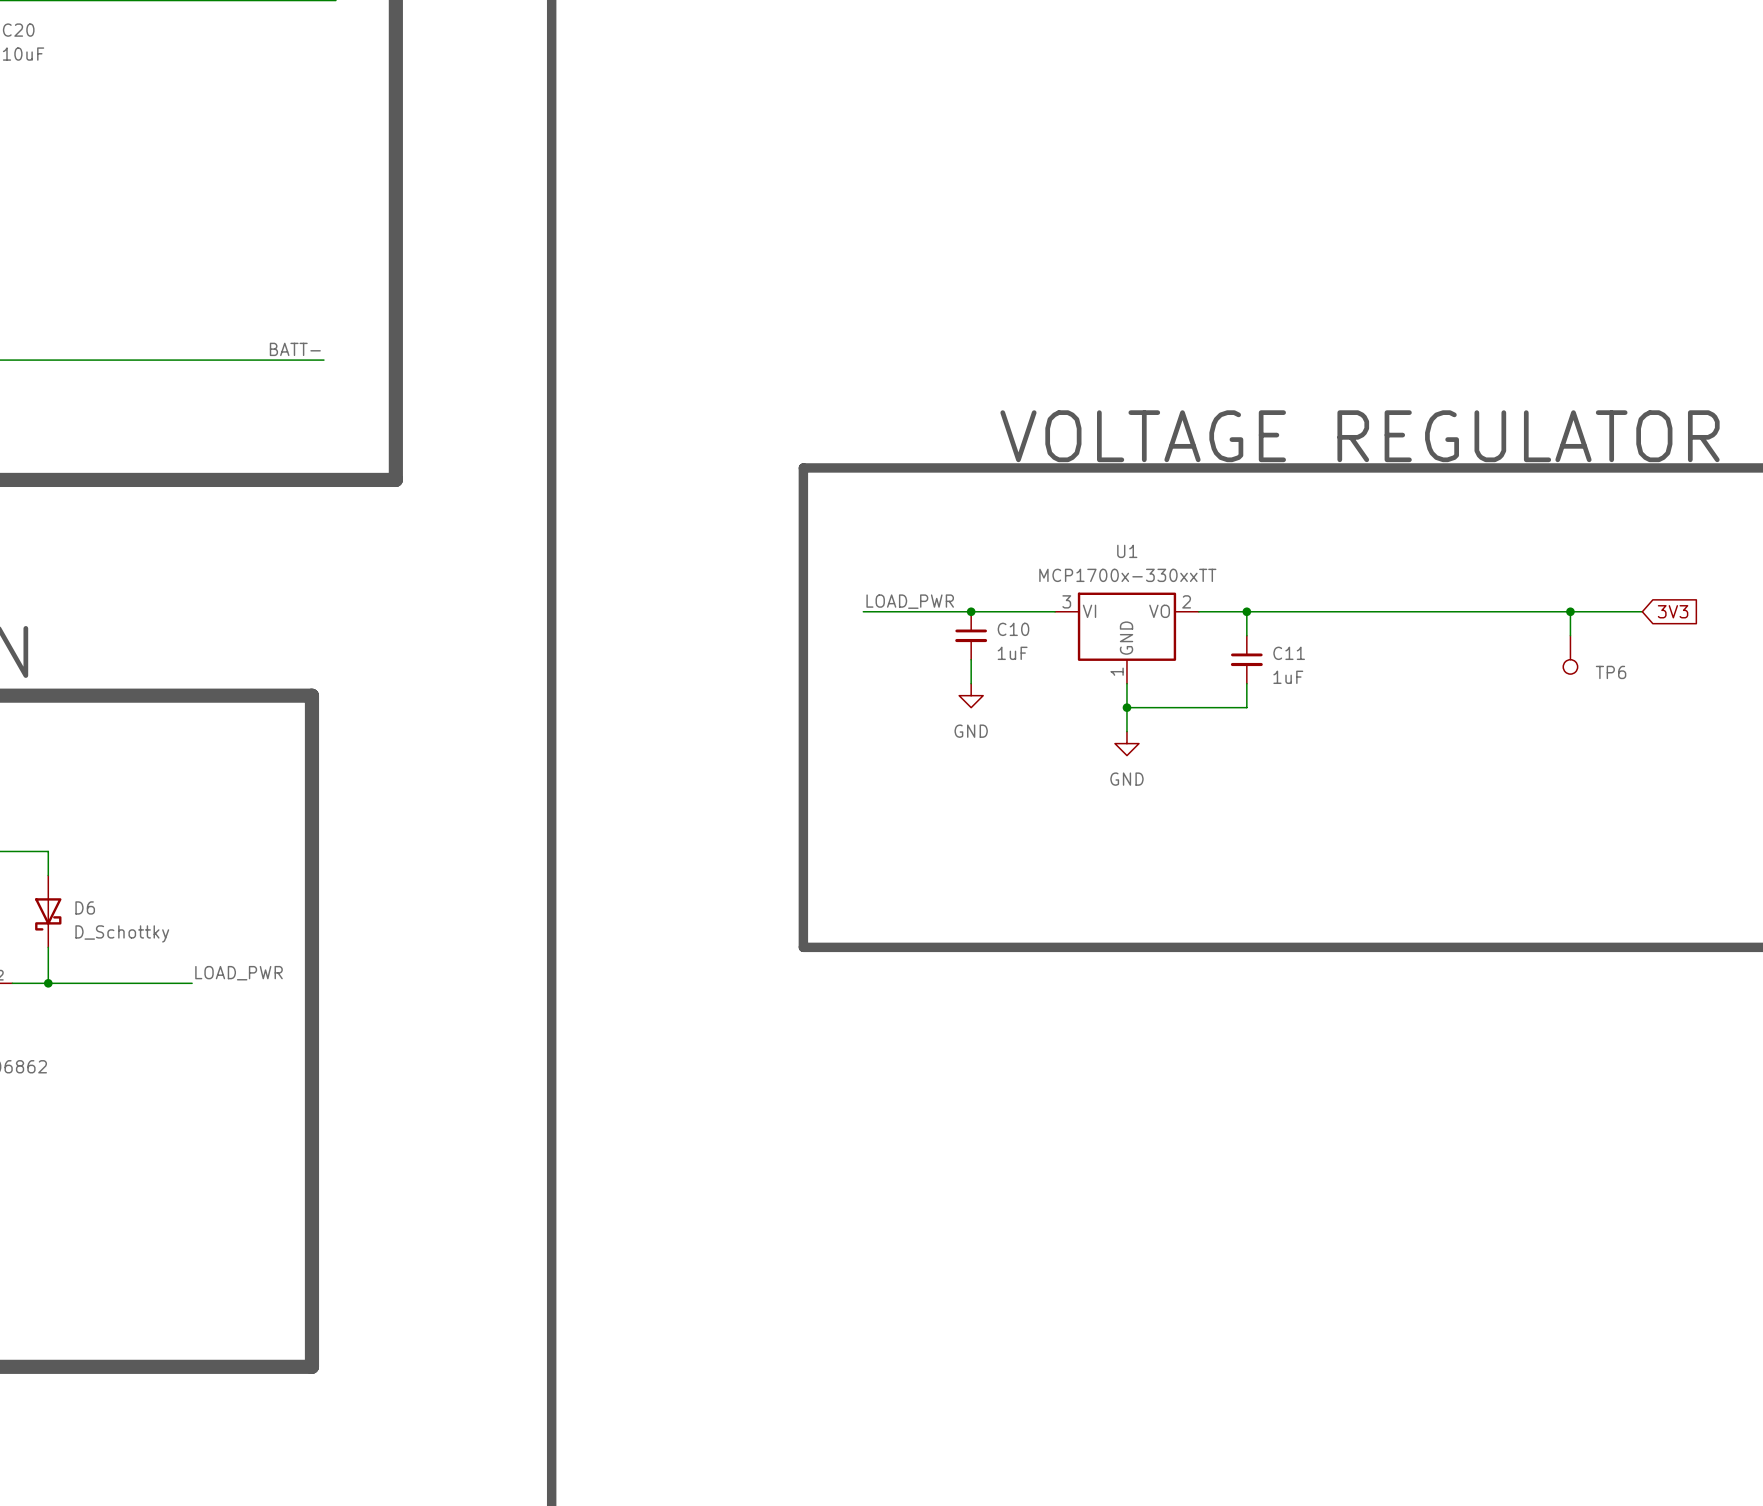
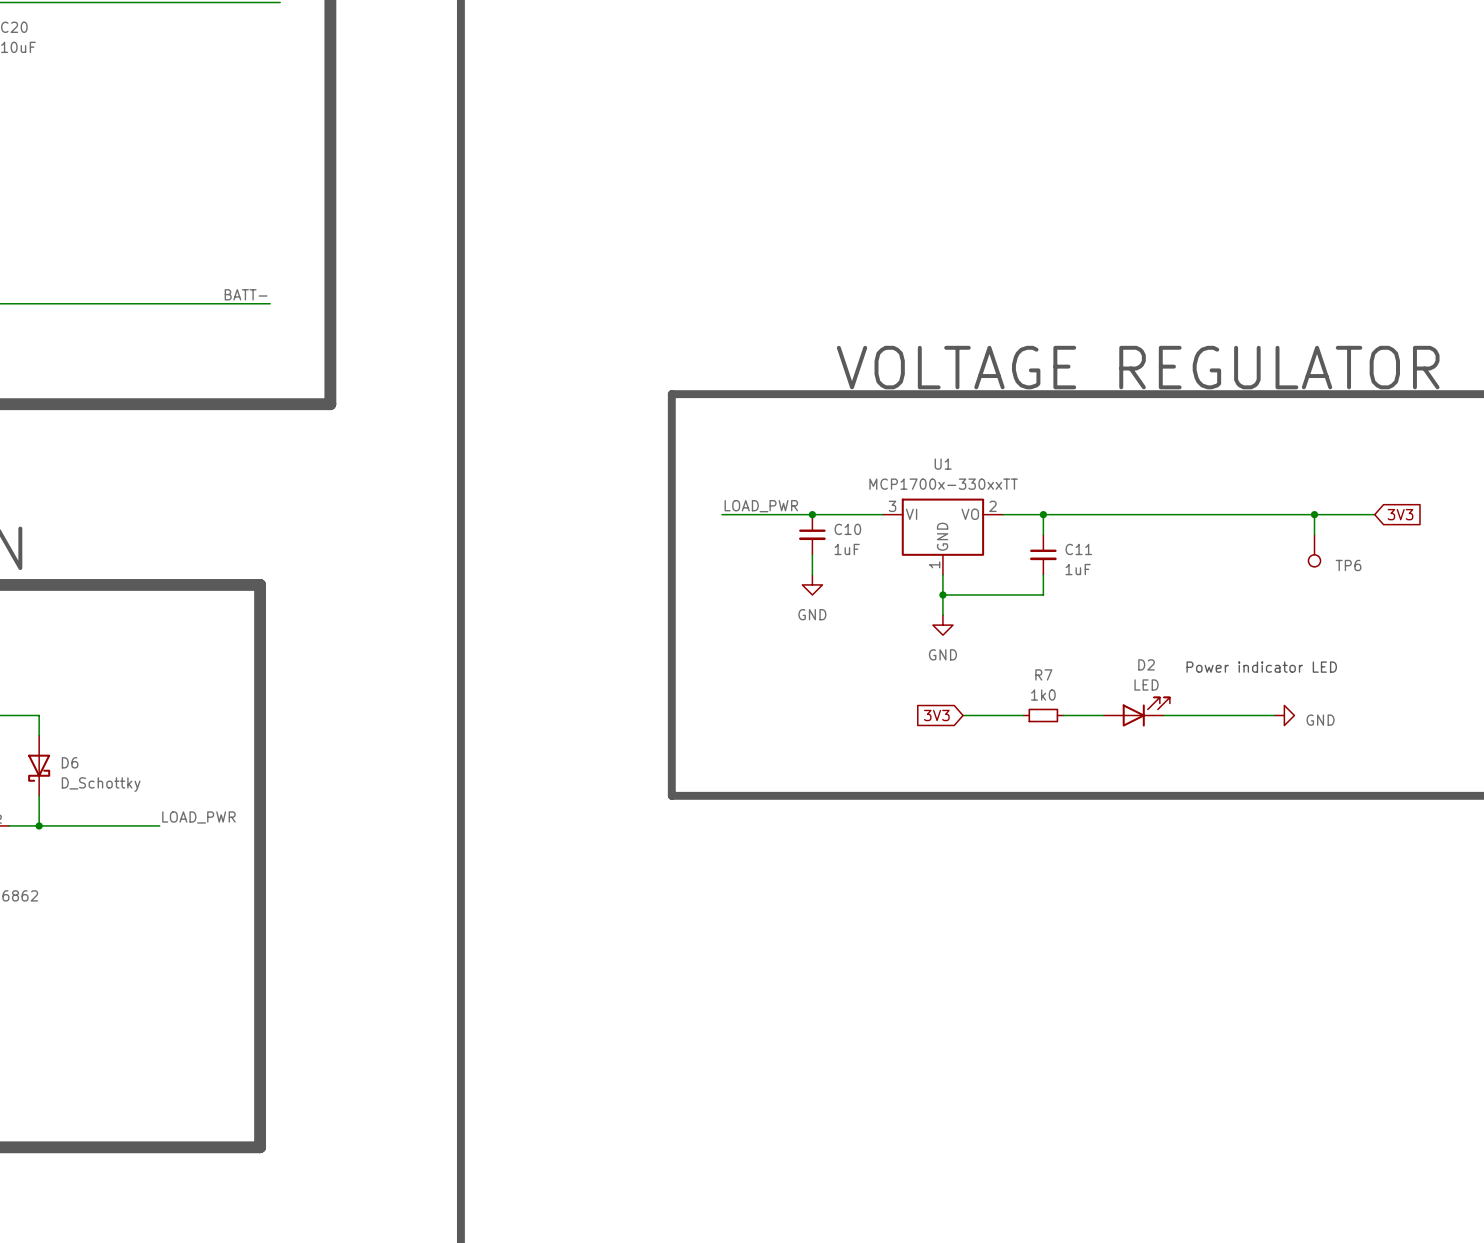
text: none -> Power indicator LED (1261, 667)
D2: none -> LED (1136, 711)
global label: none -> 3V3 (936, 715)
wire: none -> (963, 715) (1023, 715)
R7: none -> 1k0 (1043, 715)
wire: none -> (1063, 715) (1103, 715)
wire: none -> (1163, 715) (1274, 715)
power symbol: none -> GND (1284, 715)

